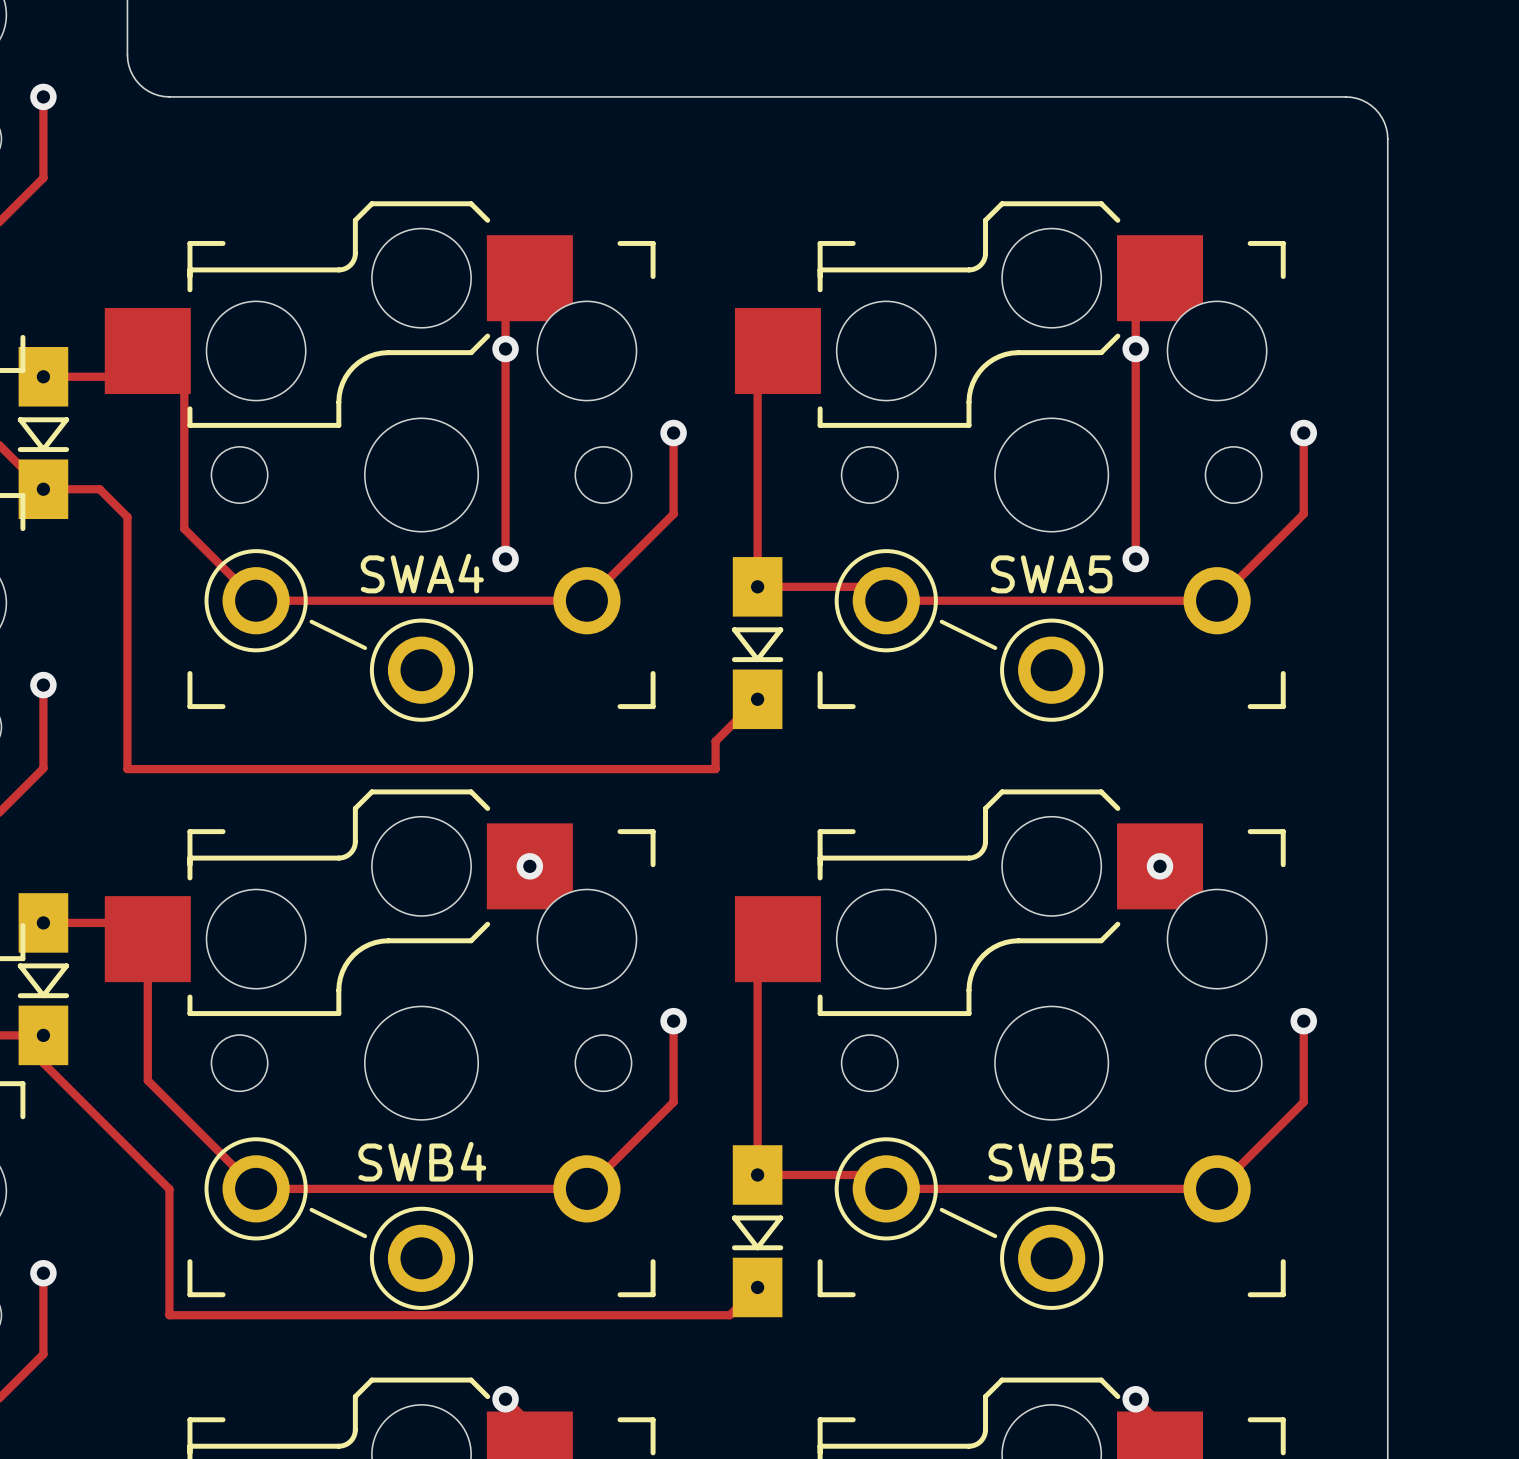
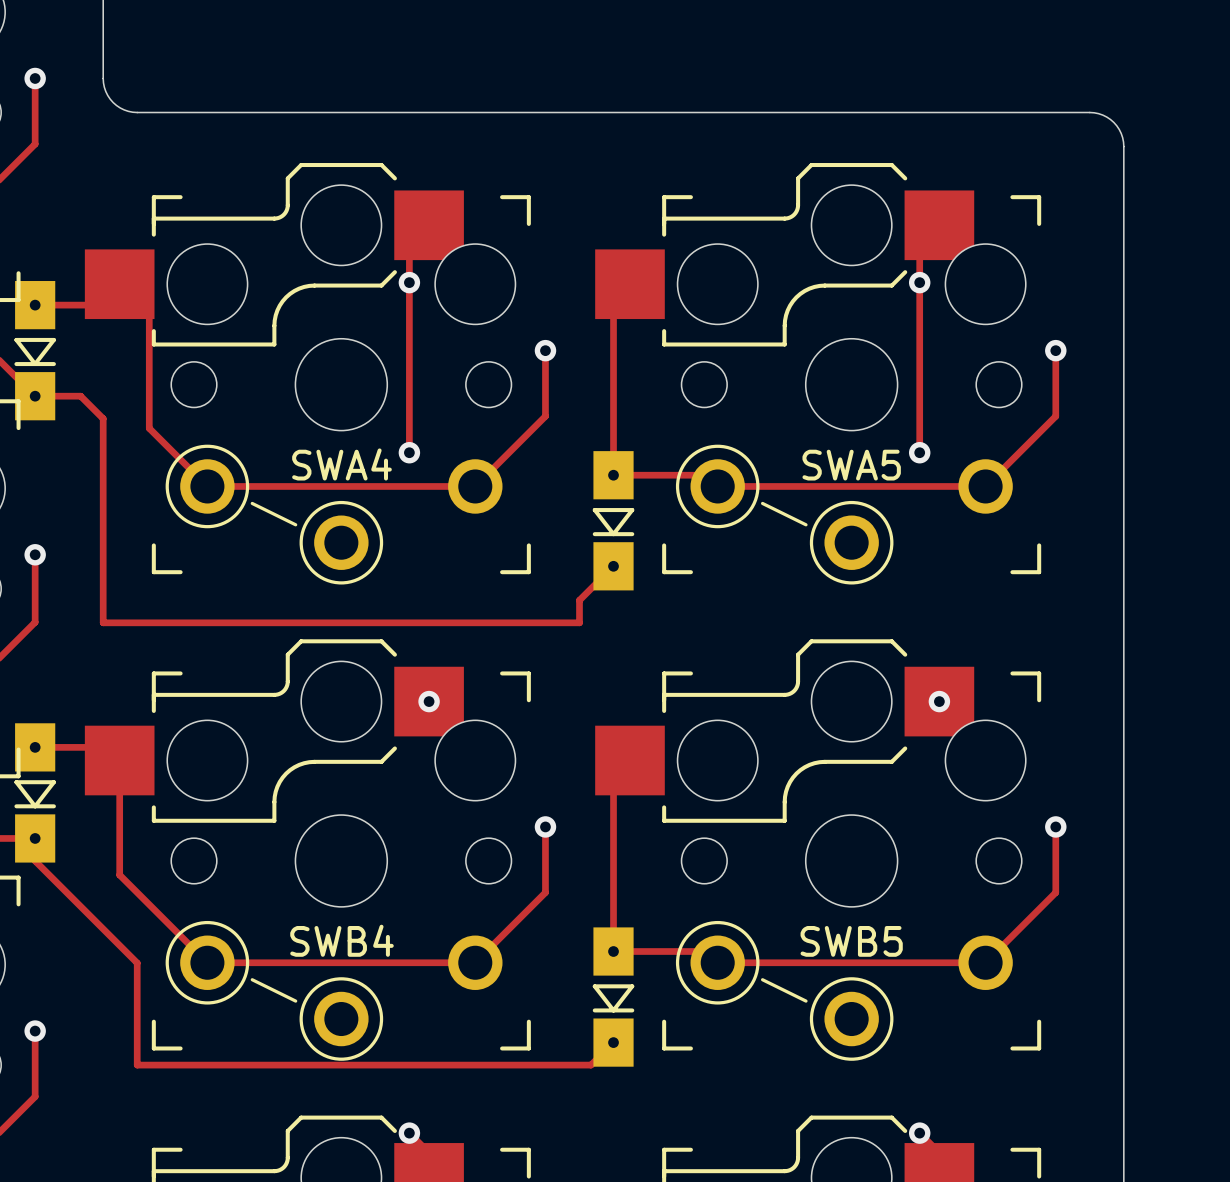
board edge: (127, 54) (130, 70) (139, 84) (153, 93) (169, 96) (1351, 97) (1371, 105) (1384, 122) (1387, 138) (1387, 180) -> (103, 44) (103, 78) (105, 91) (116, 105) (132, 112) (1089, 112) (1102, 115) (1113, 122) (1121, 133) (1123, 146)

